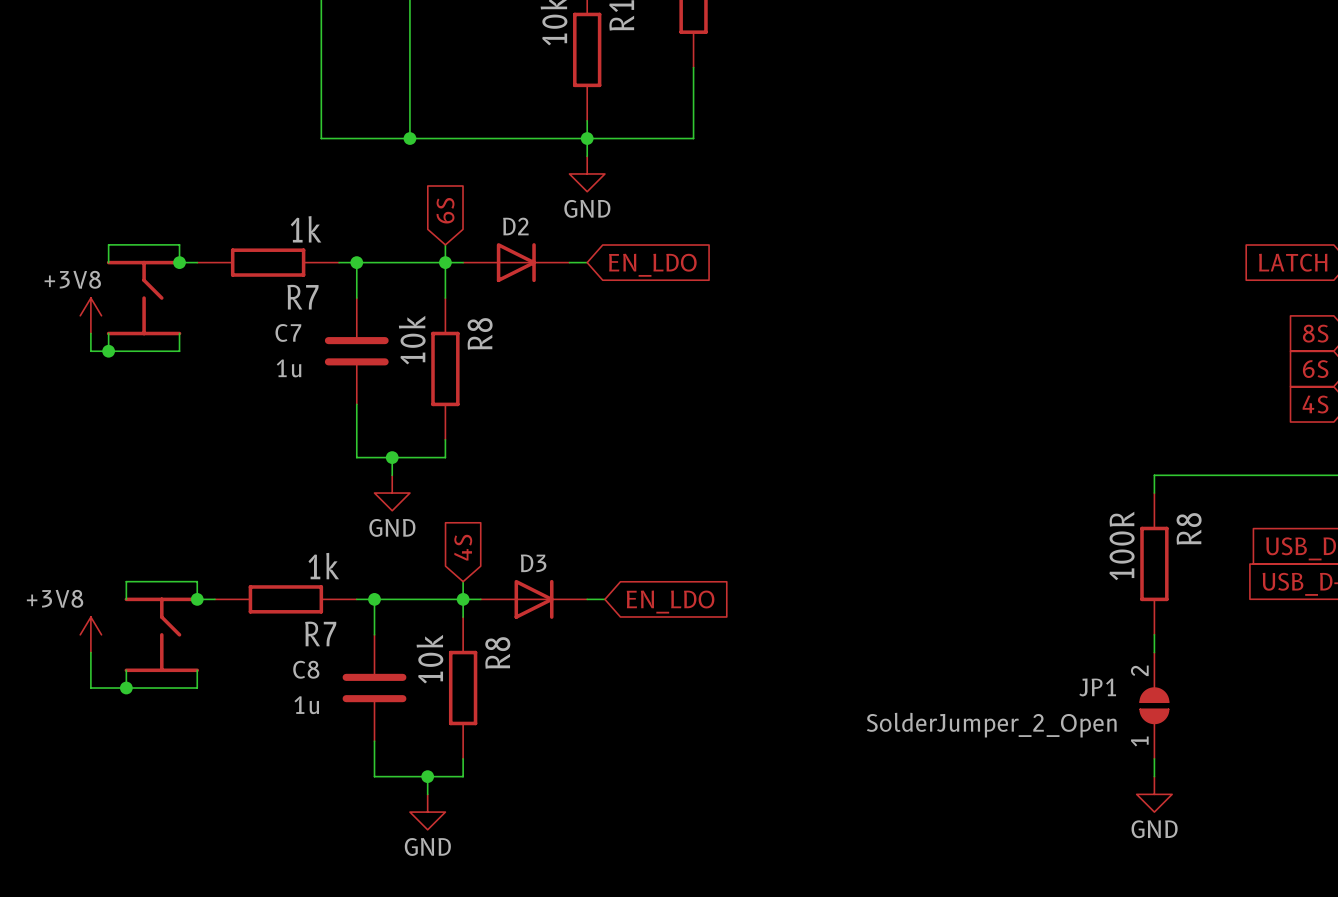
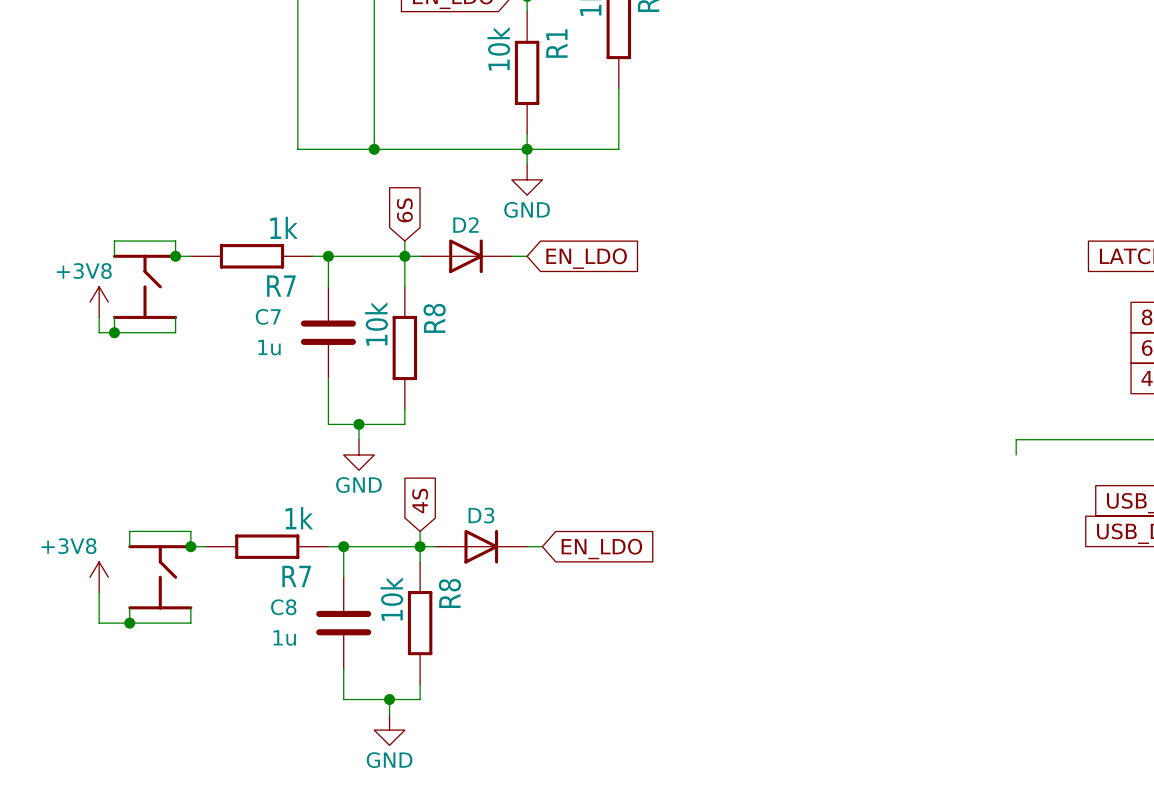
R8: 100R (1154, 563) -> none
wire: (1154, 634) (1154, 652) -> none
JP1: SolderJumper_2_Open (1154, 705) -> none
wire: (1154, 758) (1154, 776) -> none
power symbol: GND (1154, 794) -> none

